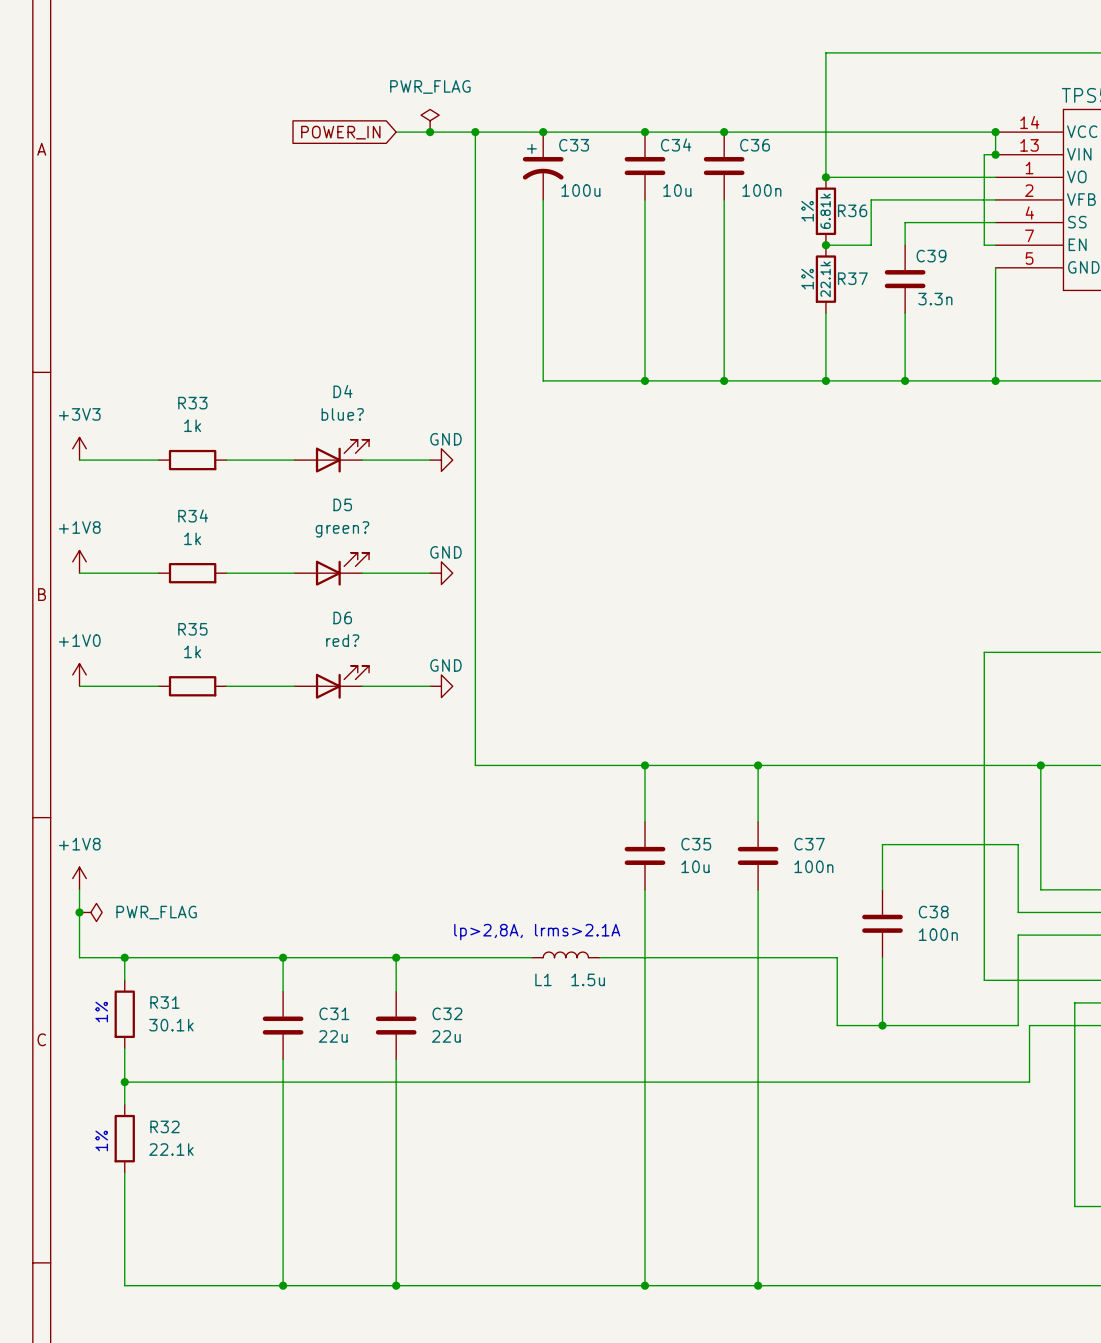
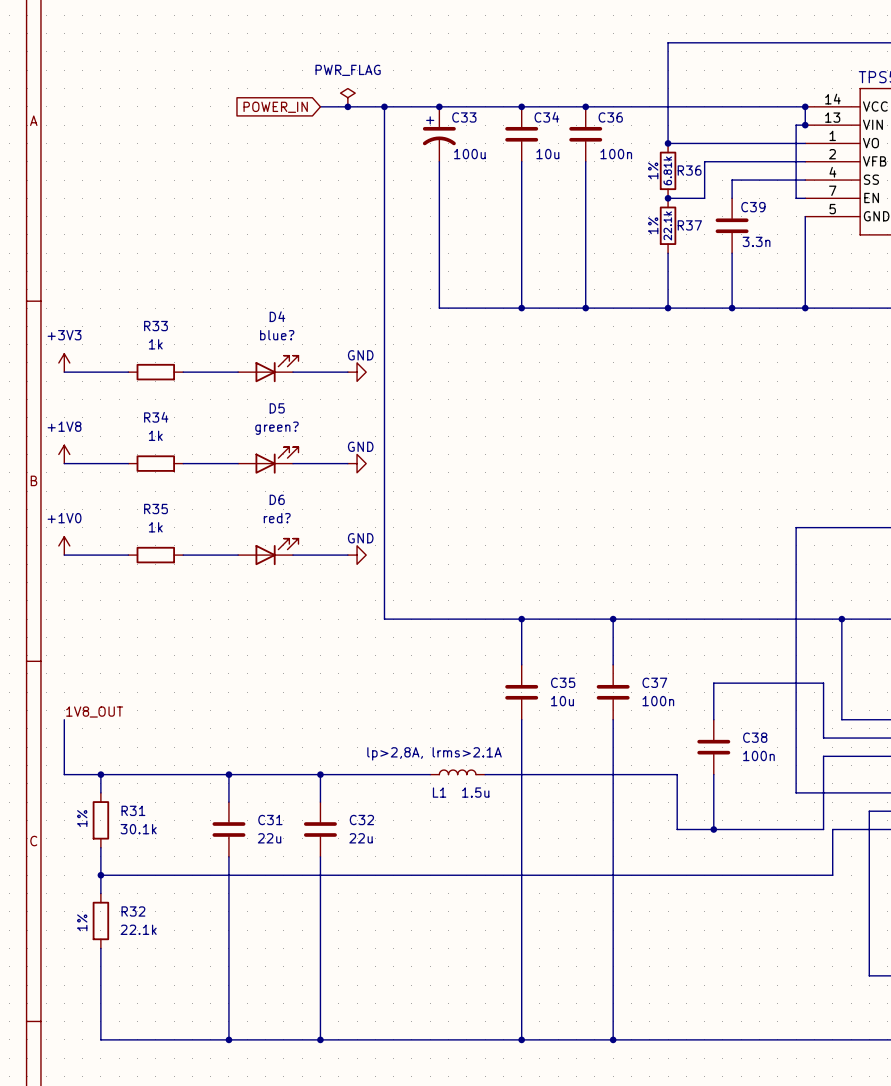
power symbol: +1V8 (79, 878) -> none
label: none -> 1V8_OUT (94, 712)
junction: (79, 912) -> none
power symbol: PWR_FLAG (90, 912) -> none

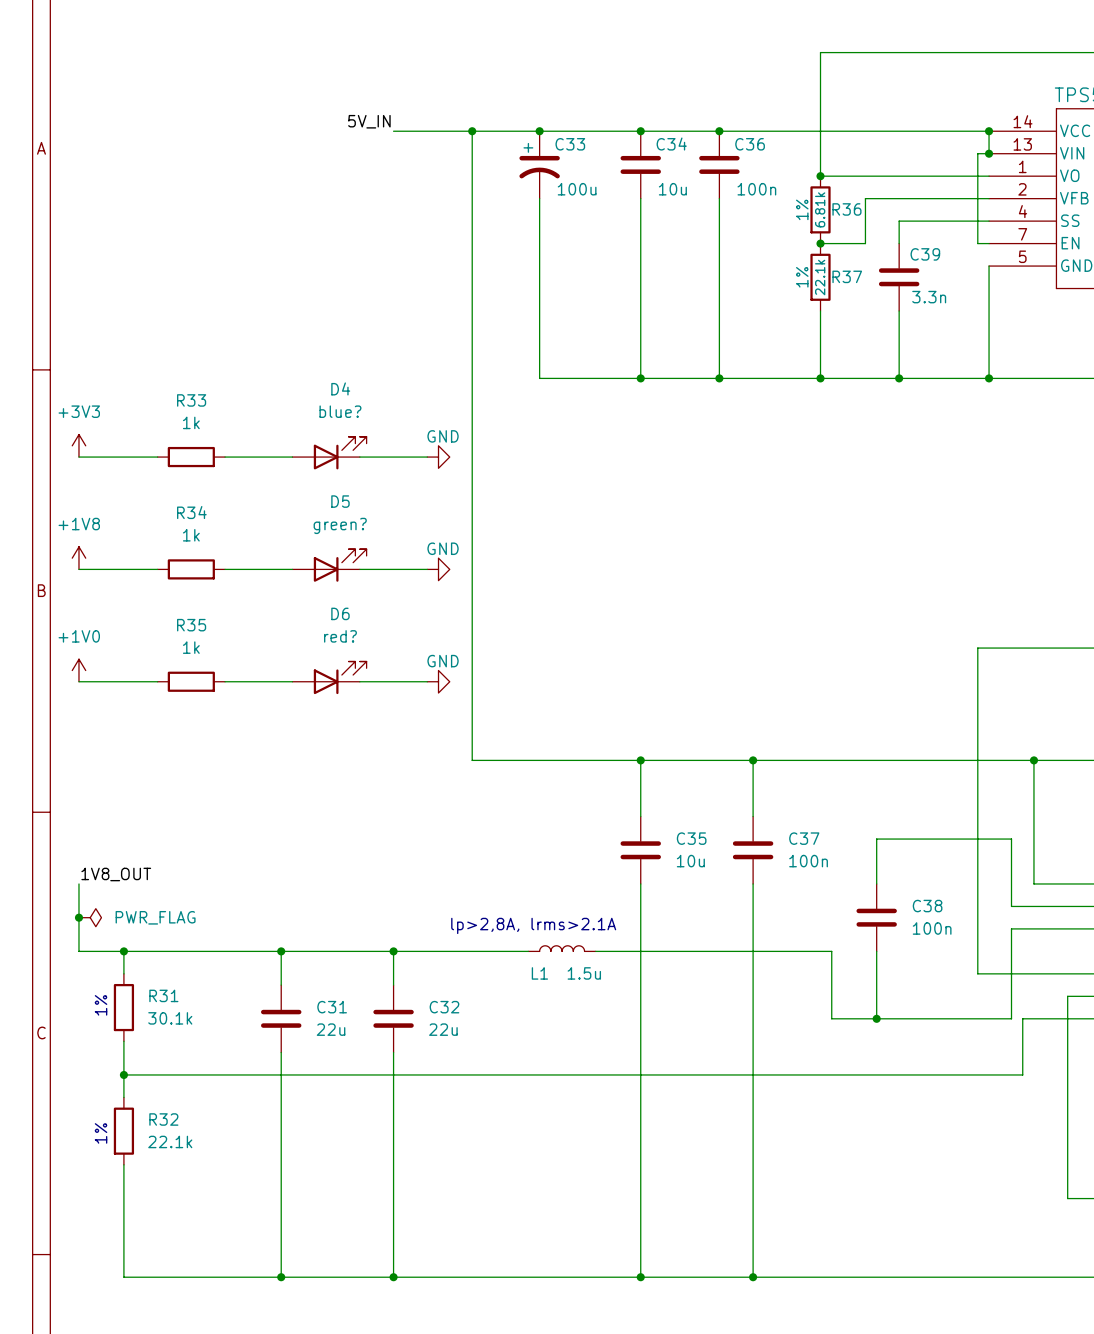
power symbol: PWR_FLAG (347, 97) -> none
label: none -> 5V_IN (369, 121)
junction: (347, 106) -> none
global label: POWER_IN (275, 107) -> none
junction: none -> (78, 917)
power symbol: none -> PWR_FLAG (90, 917)

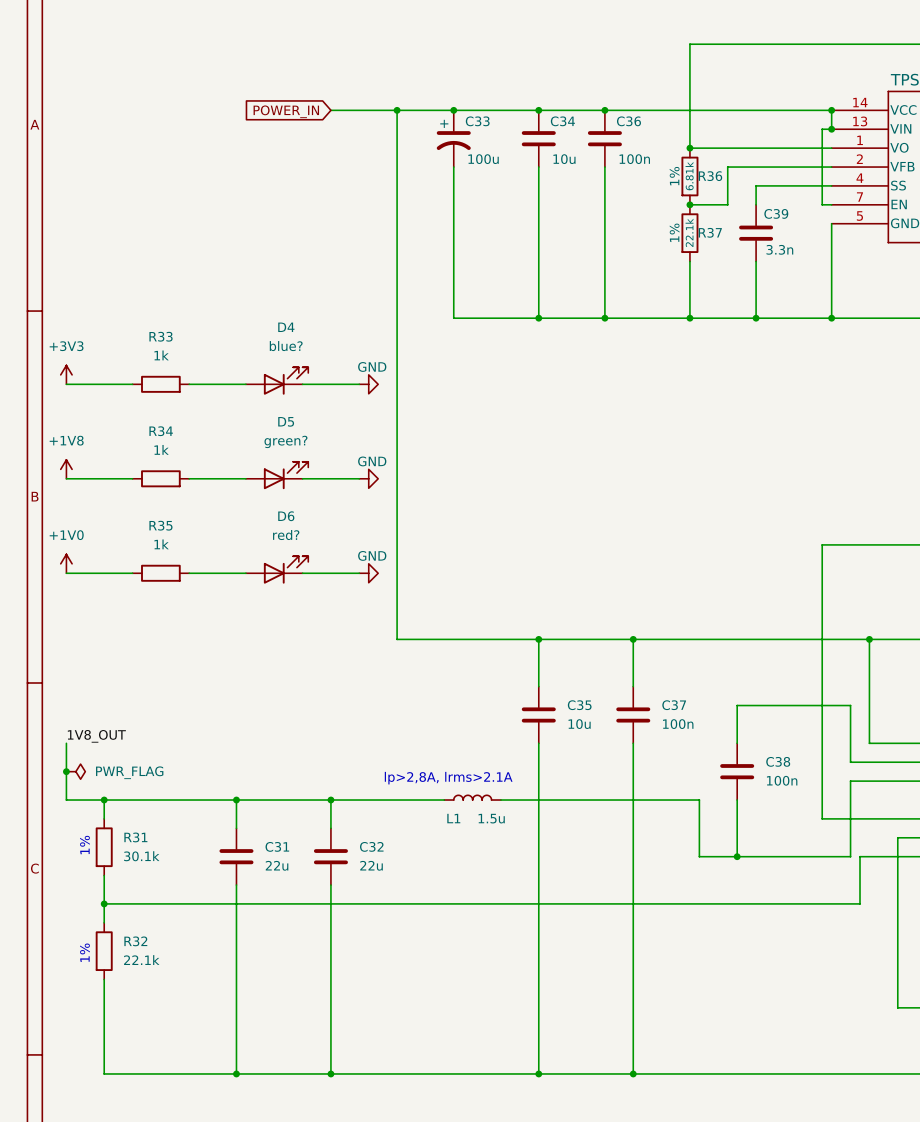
label: 5V_IN (369, 121) -> none
global label: none -> POWER_IN (286, 111)

